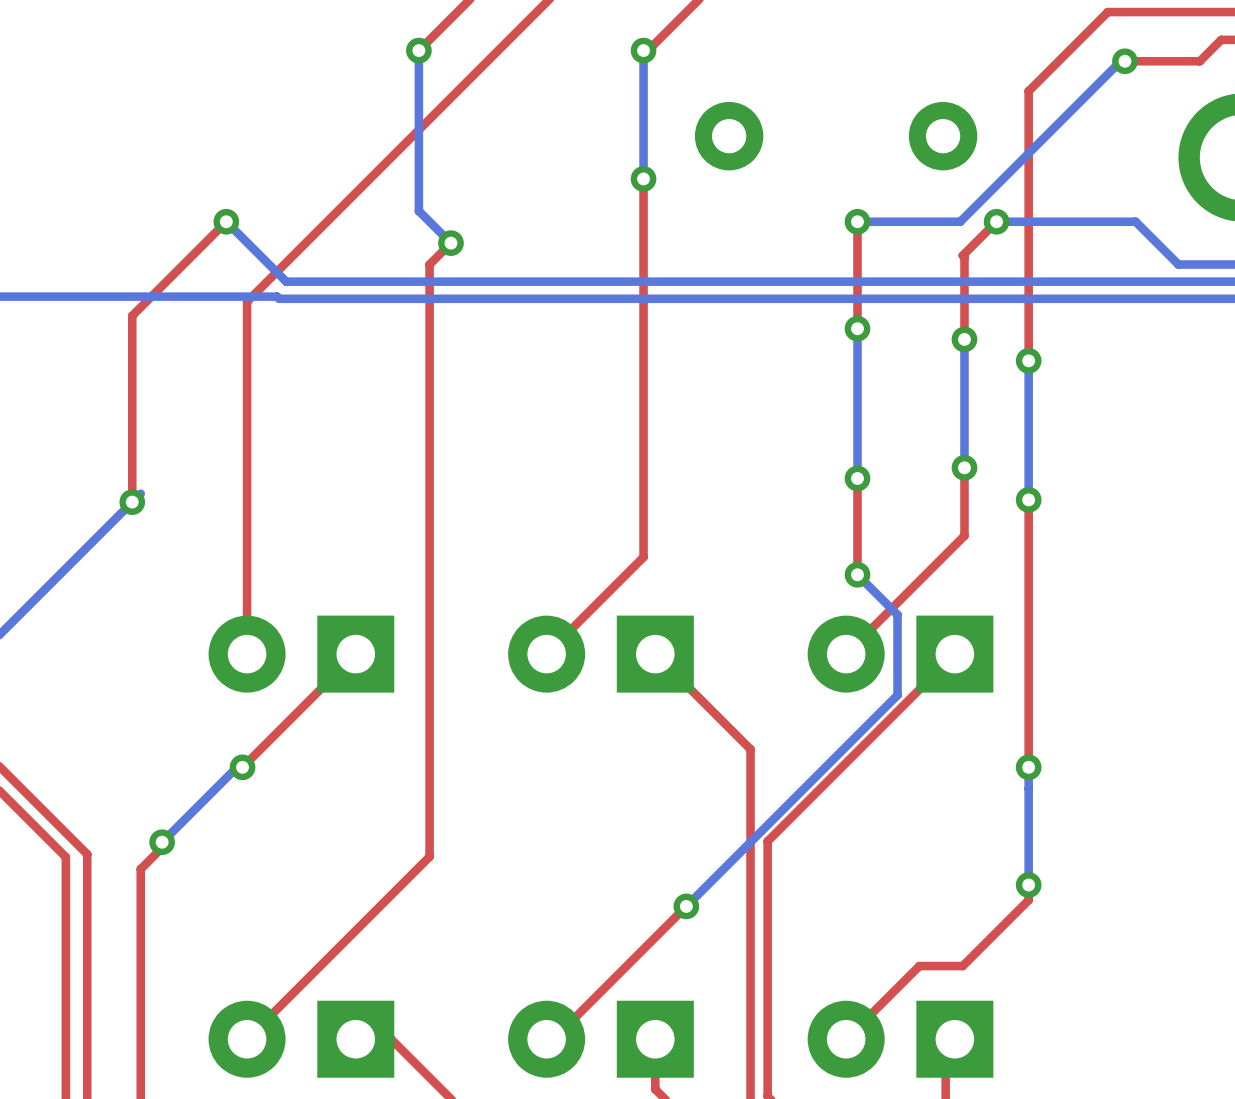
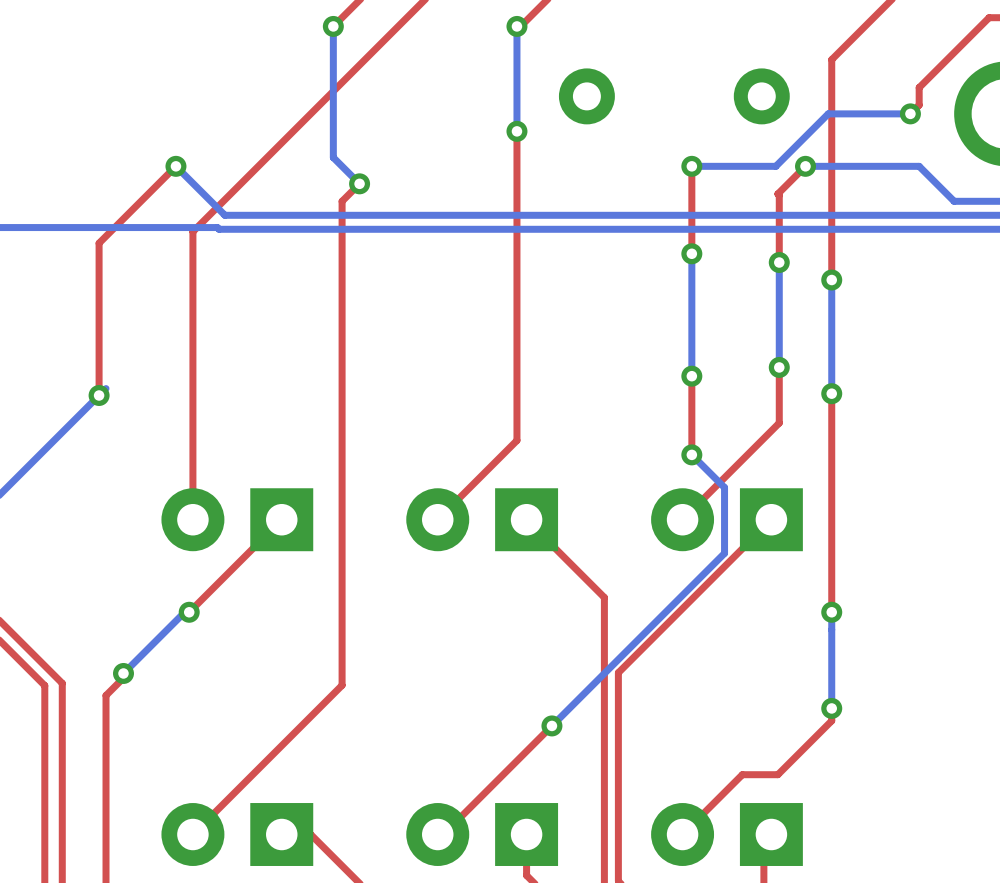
bottom track: (1124, 61) (1120, 61) (1024, 157) -> (910, 113) (828, 113)
via position: (1124, 61) -> (910, 113)
top track: (1199, 61) (1124, 61) -> (971, 35) (919, 87) (919, 105) (910, 113)

